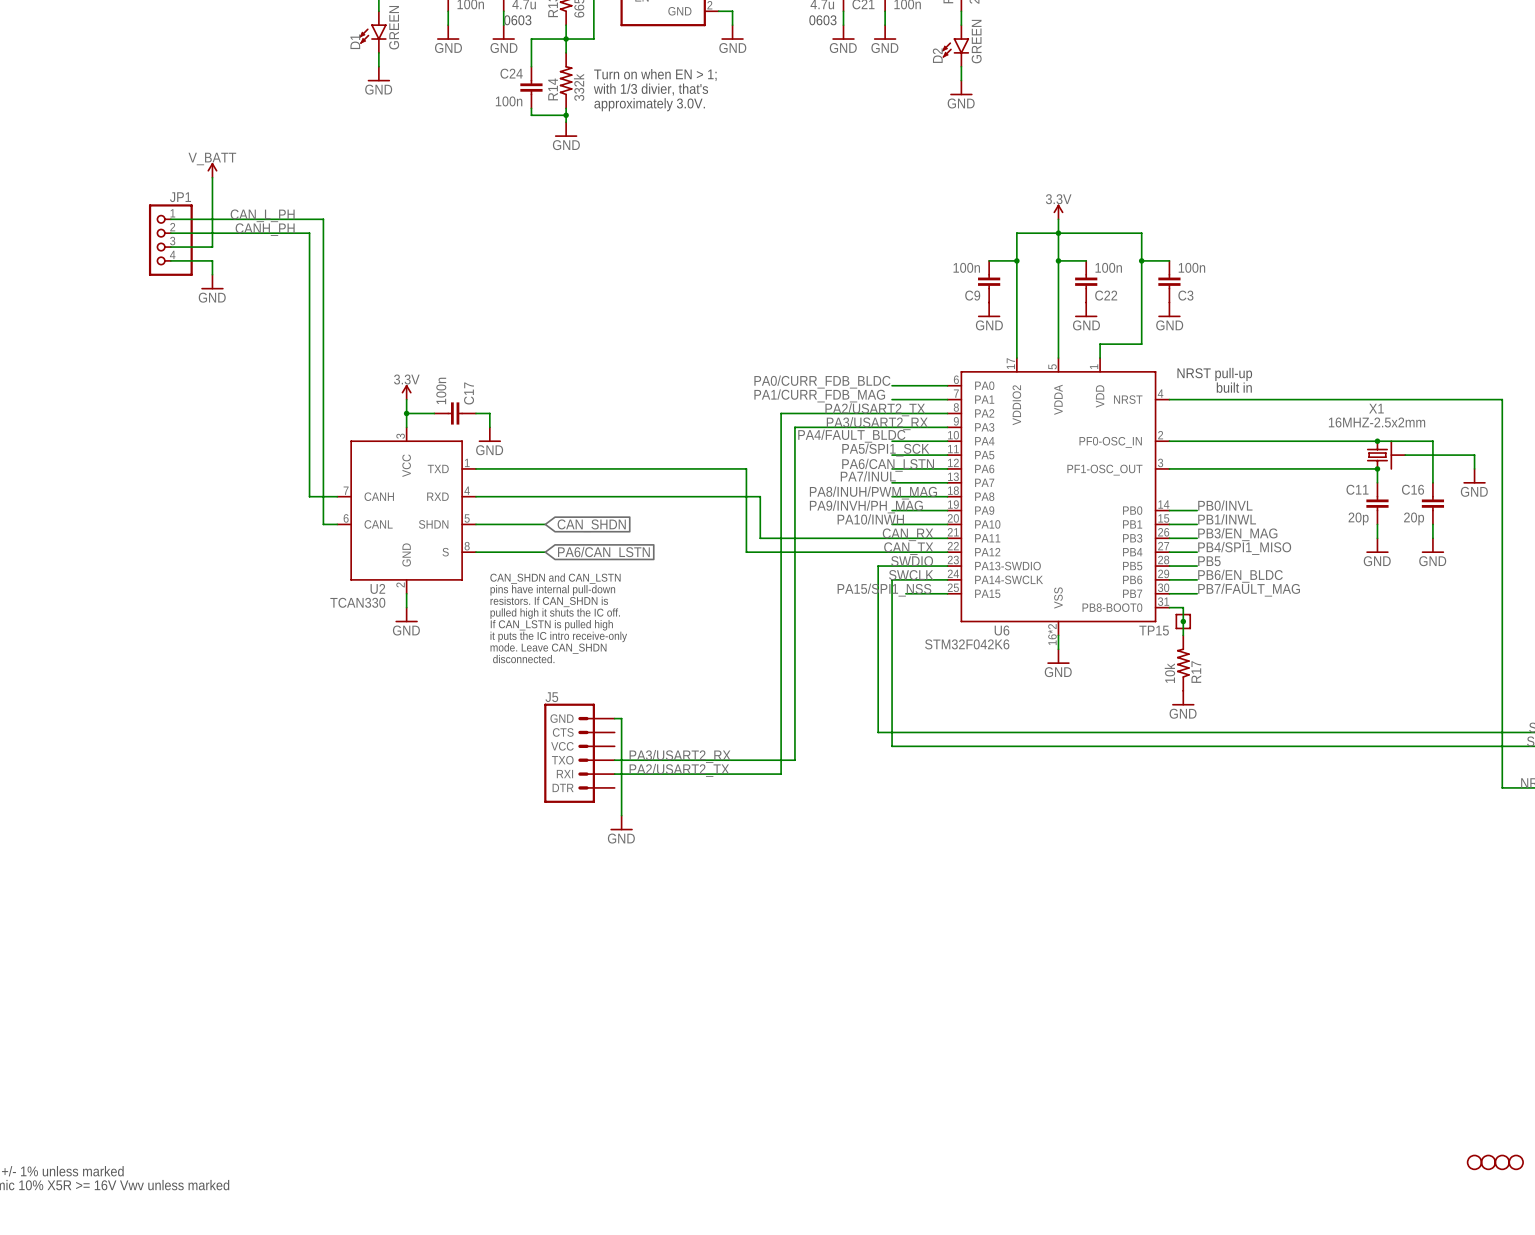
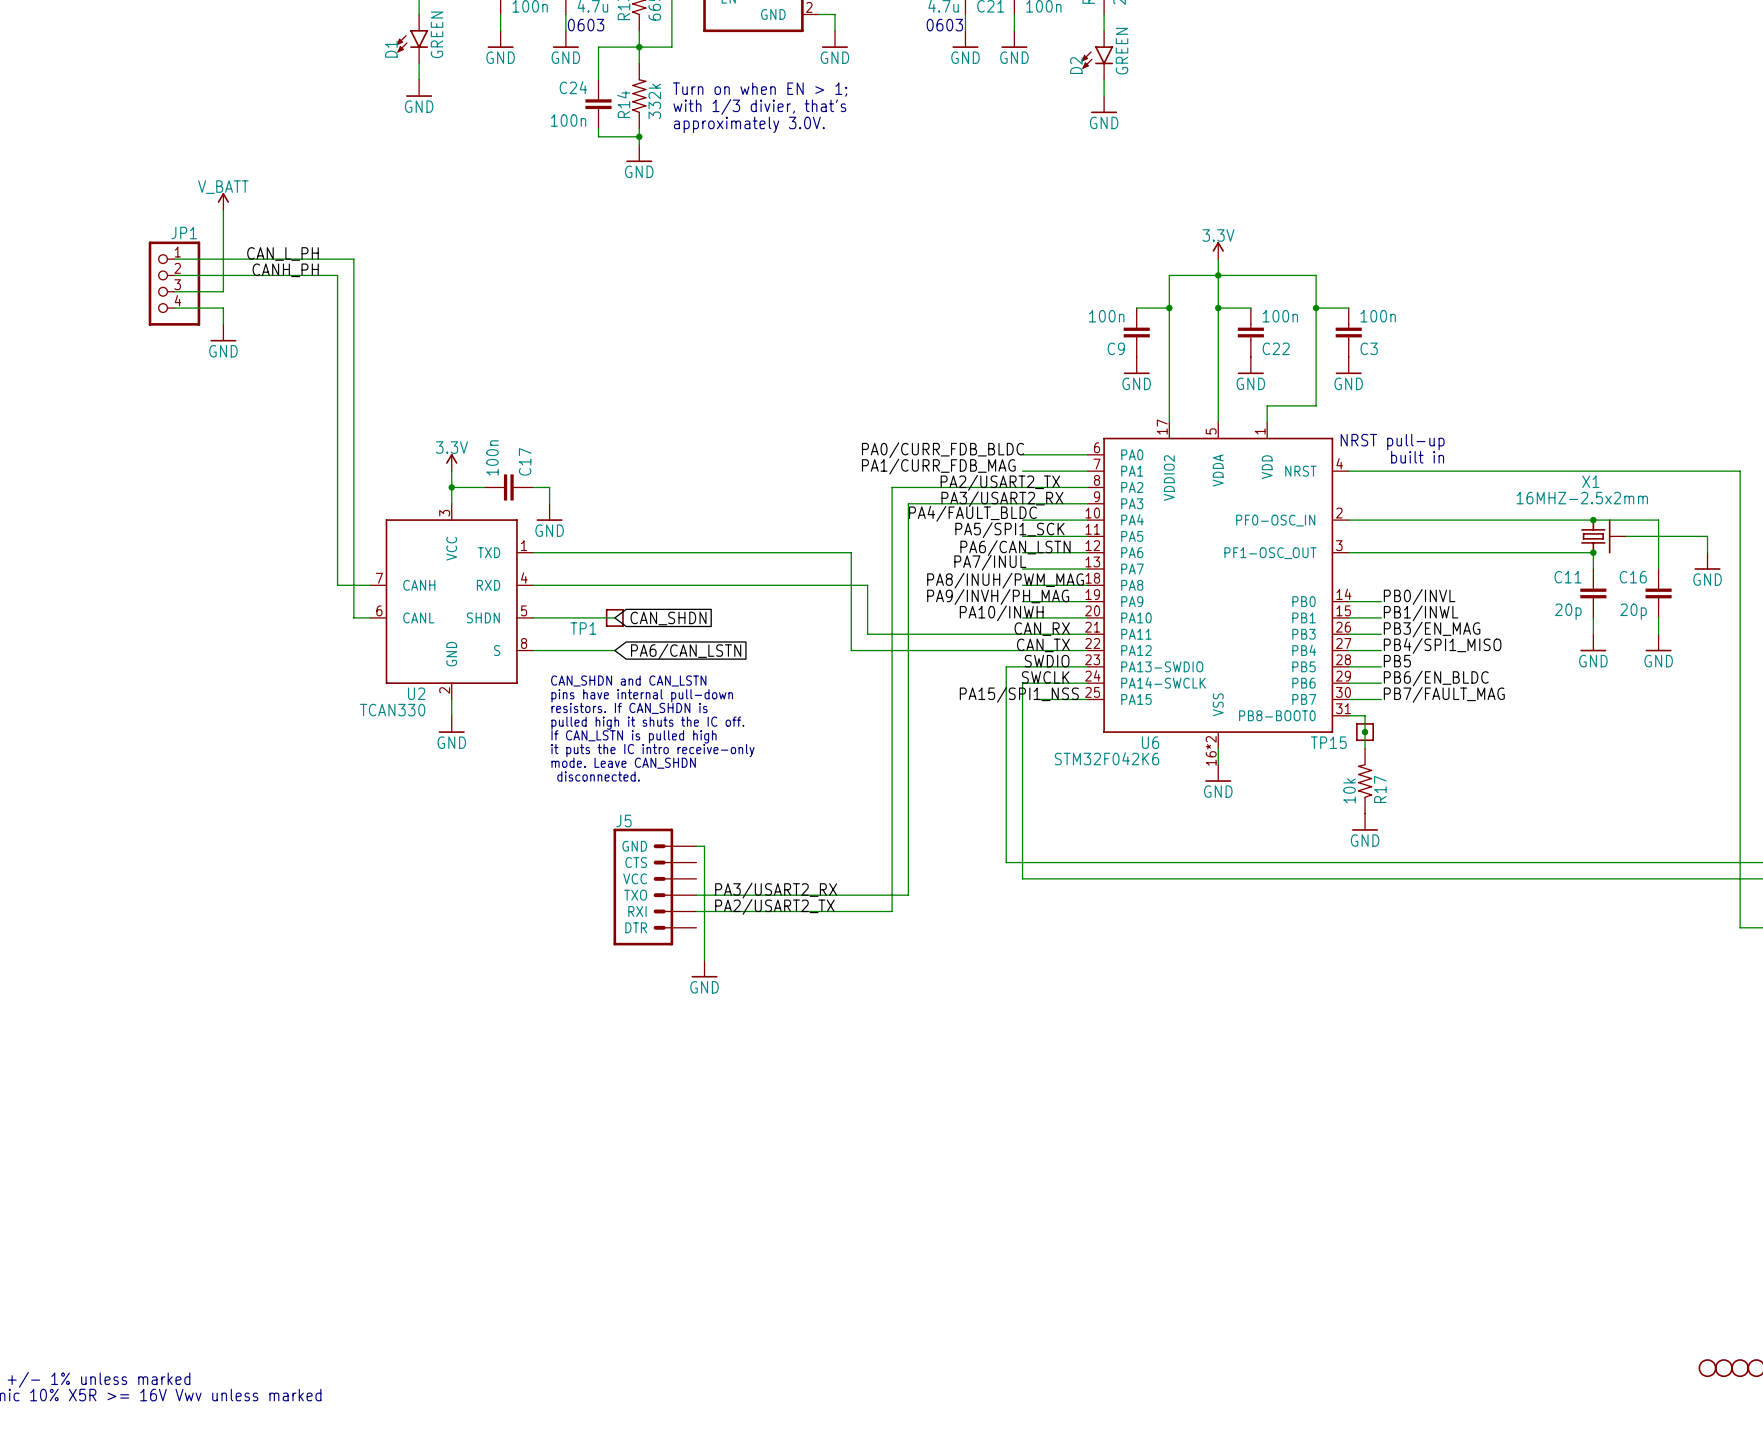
TP1: none -> (614, 617)

